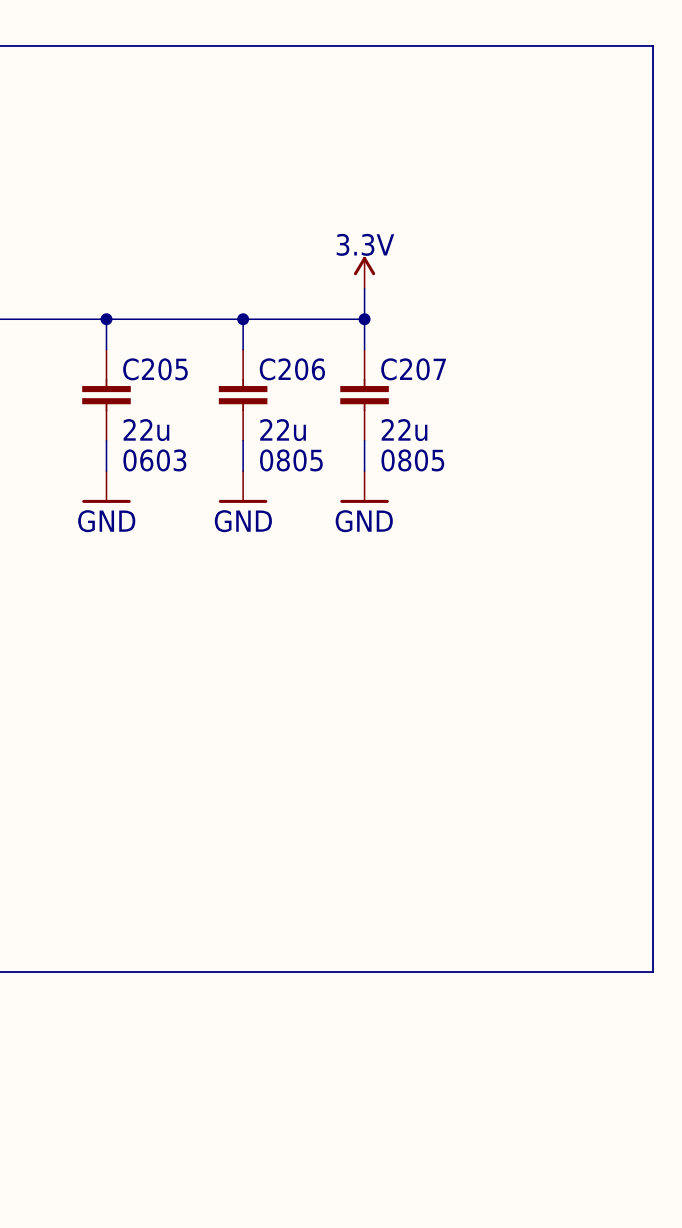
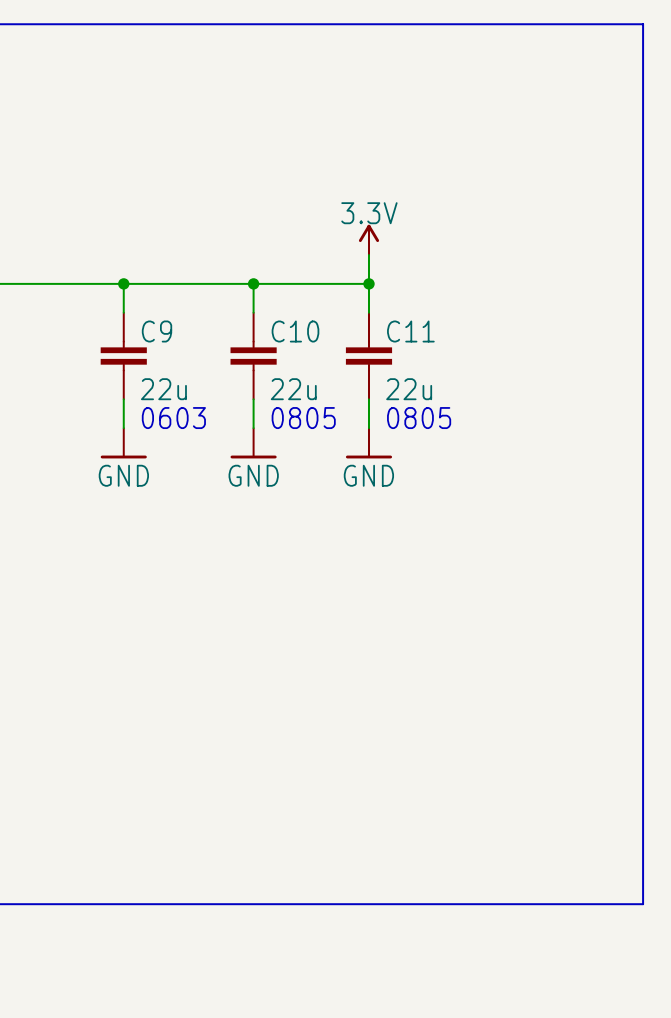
C205 name: C205 (155, 369) -> C9 (156, 331)
C206 name: C206 (292, 369) -> C10 (295, 331)
C207 name: C207 (413, 369) -> C11 (410, 331)

